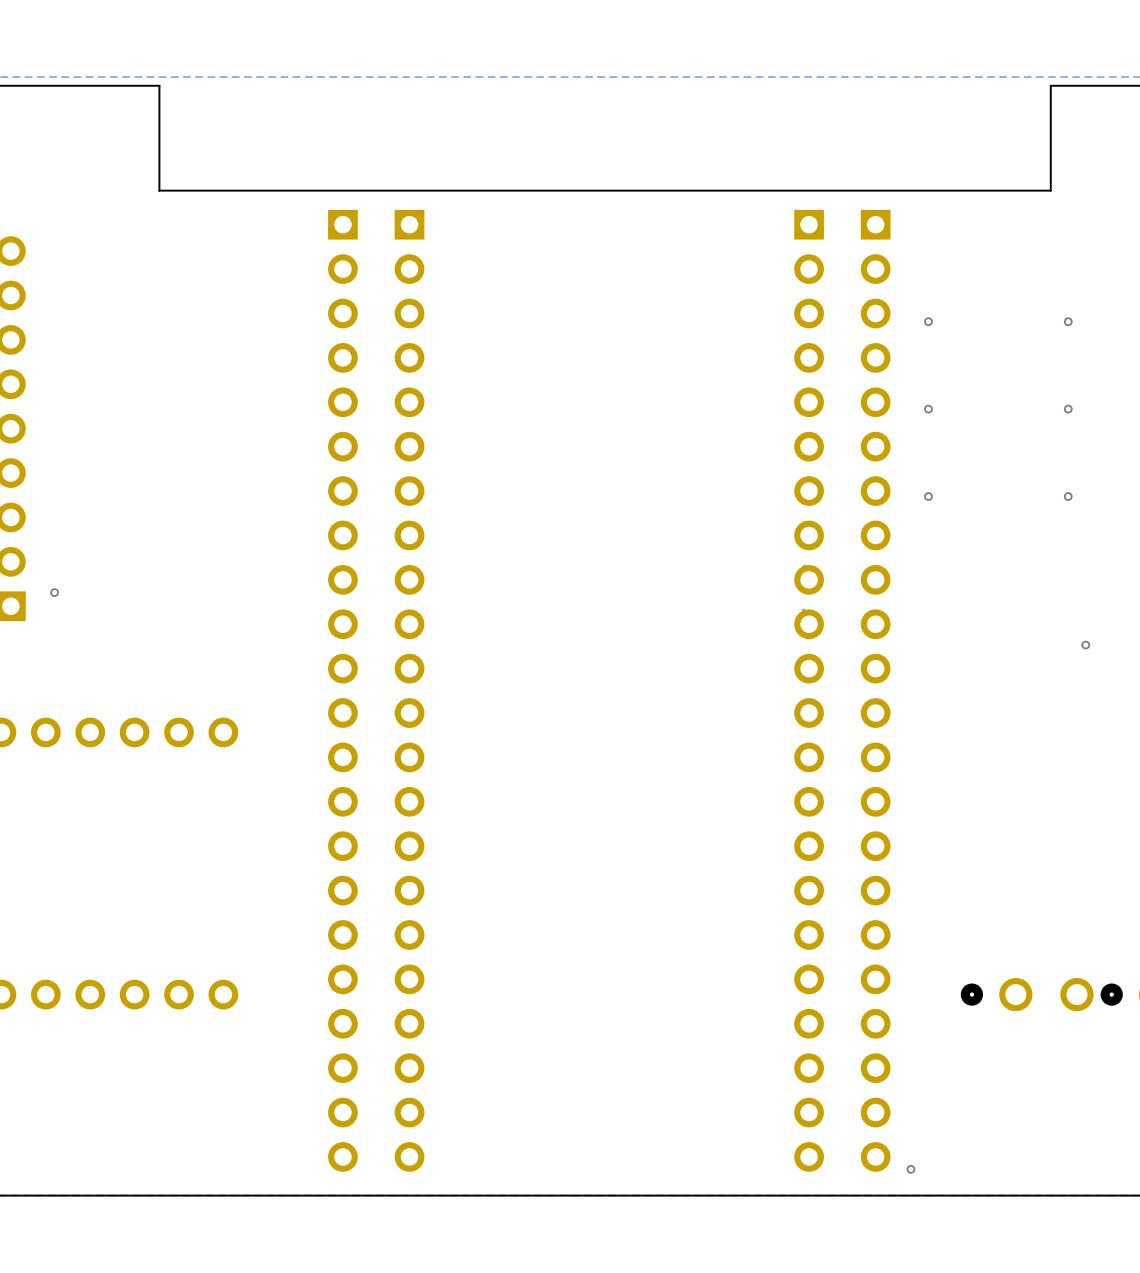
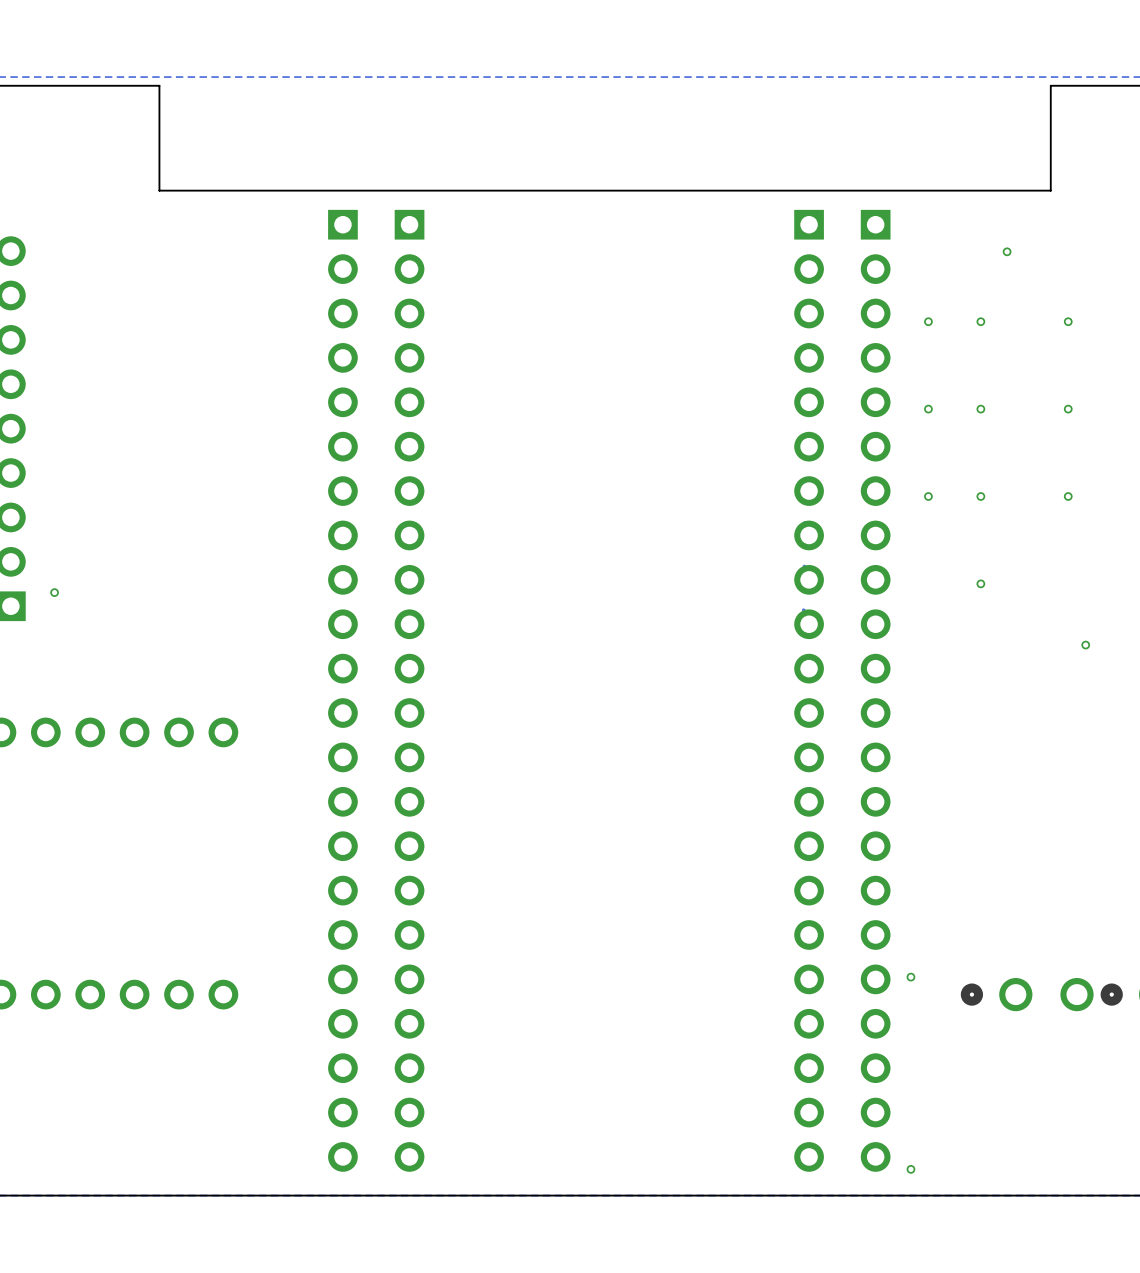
via: none -> (1007, 251)
via: none -> (980, 321)
via: none -> (980, 409)
via: none -> (980, 496)
via: none -> (980, 583)
via: none -> (910, 977)

